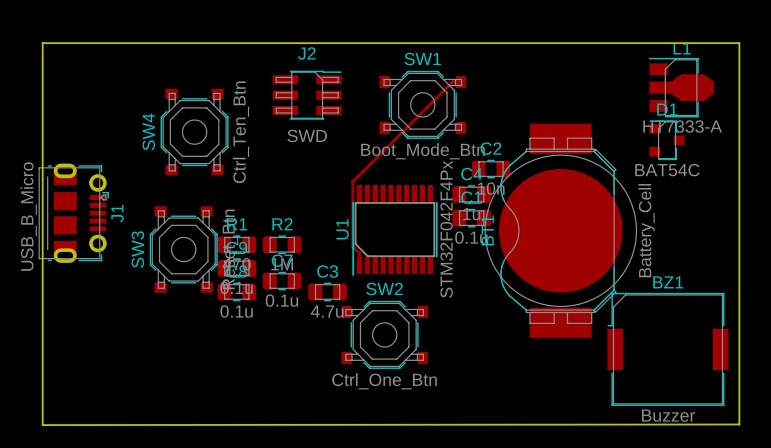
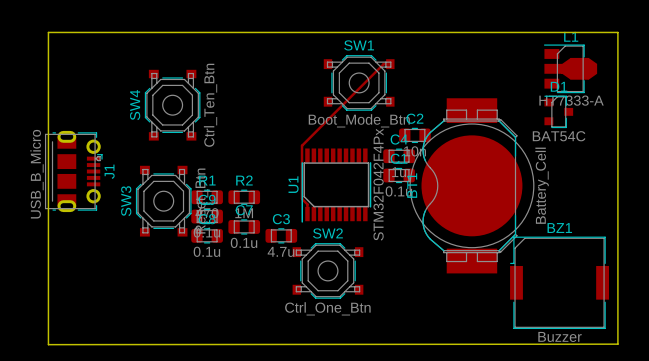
J2: SWD (307, 95) -> none

